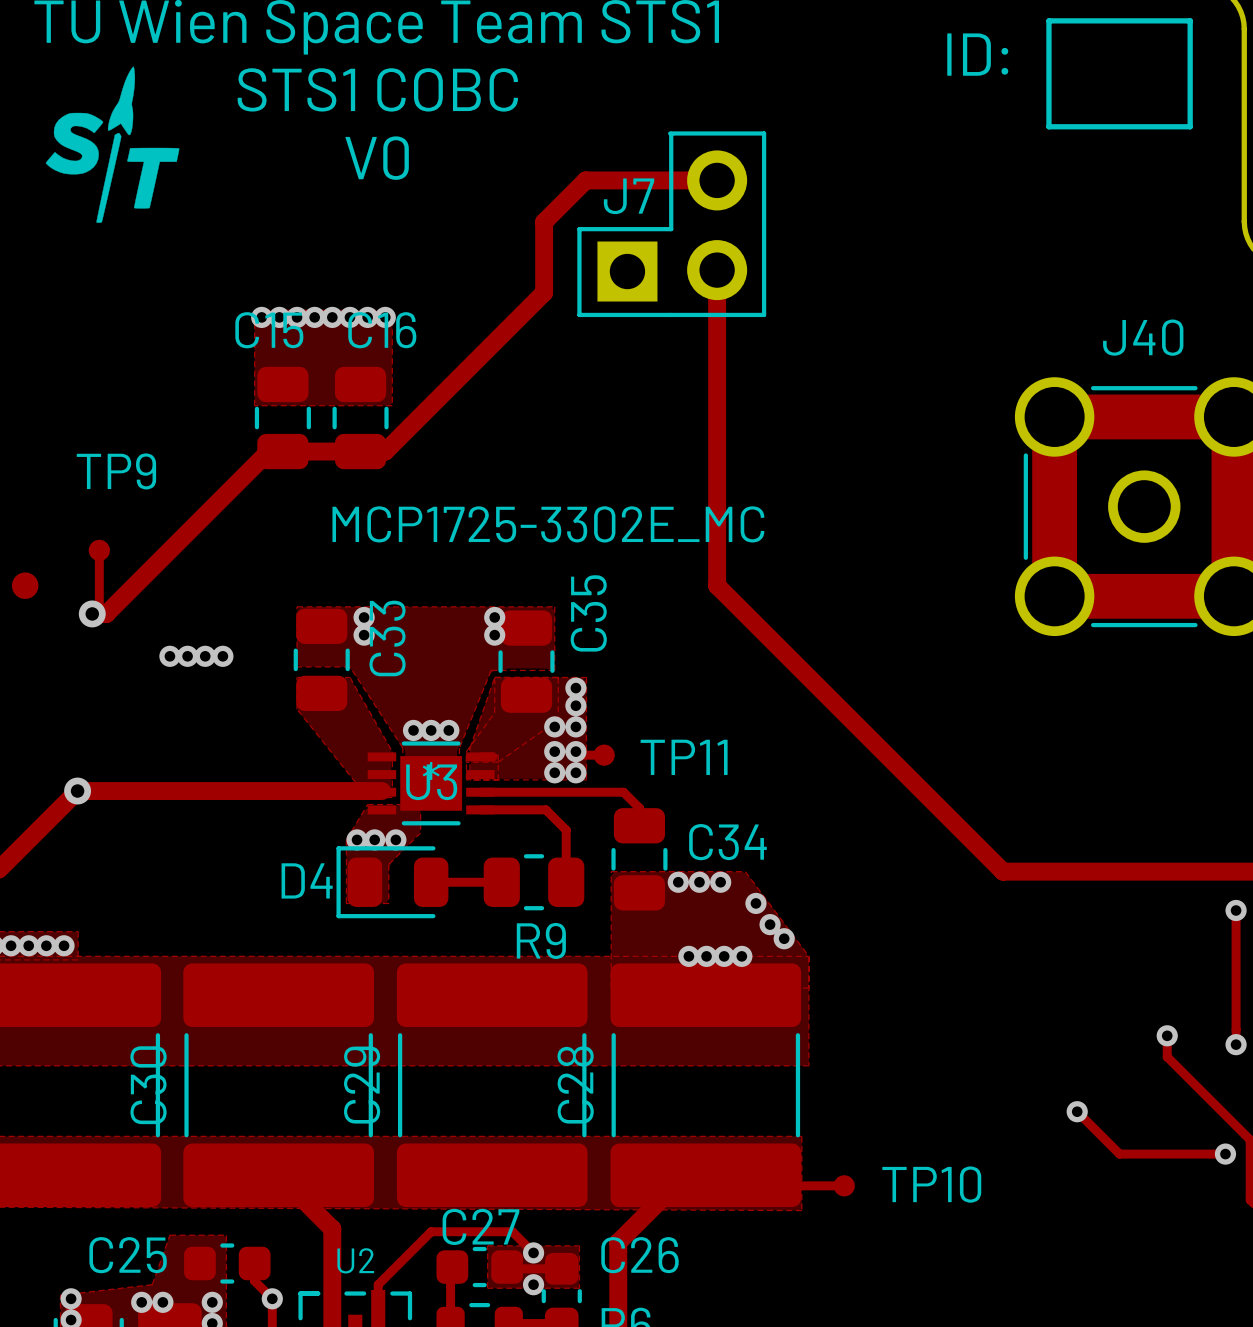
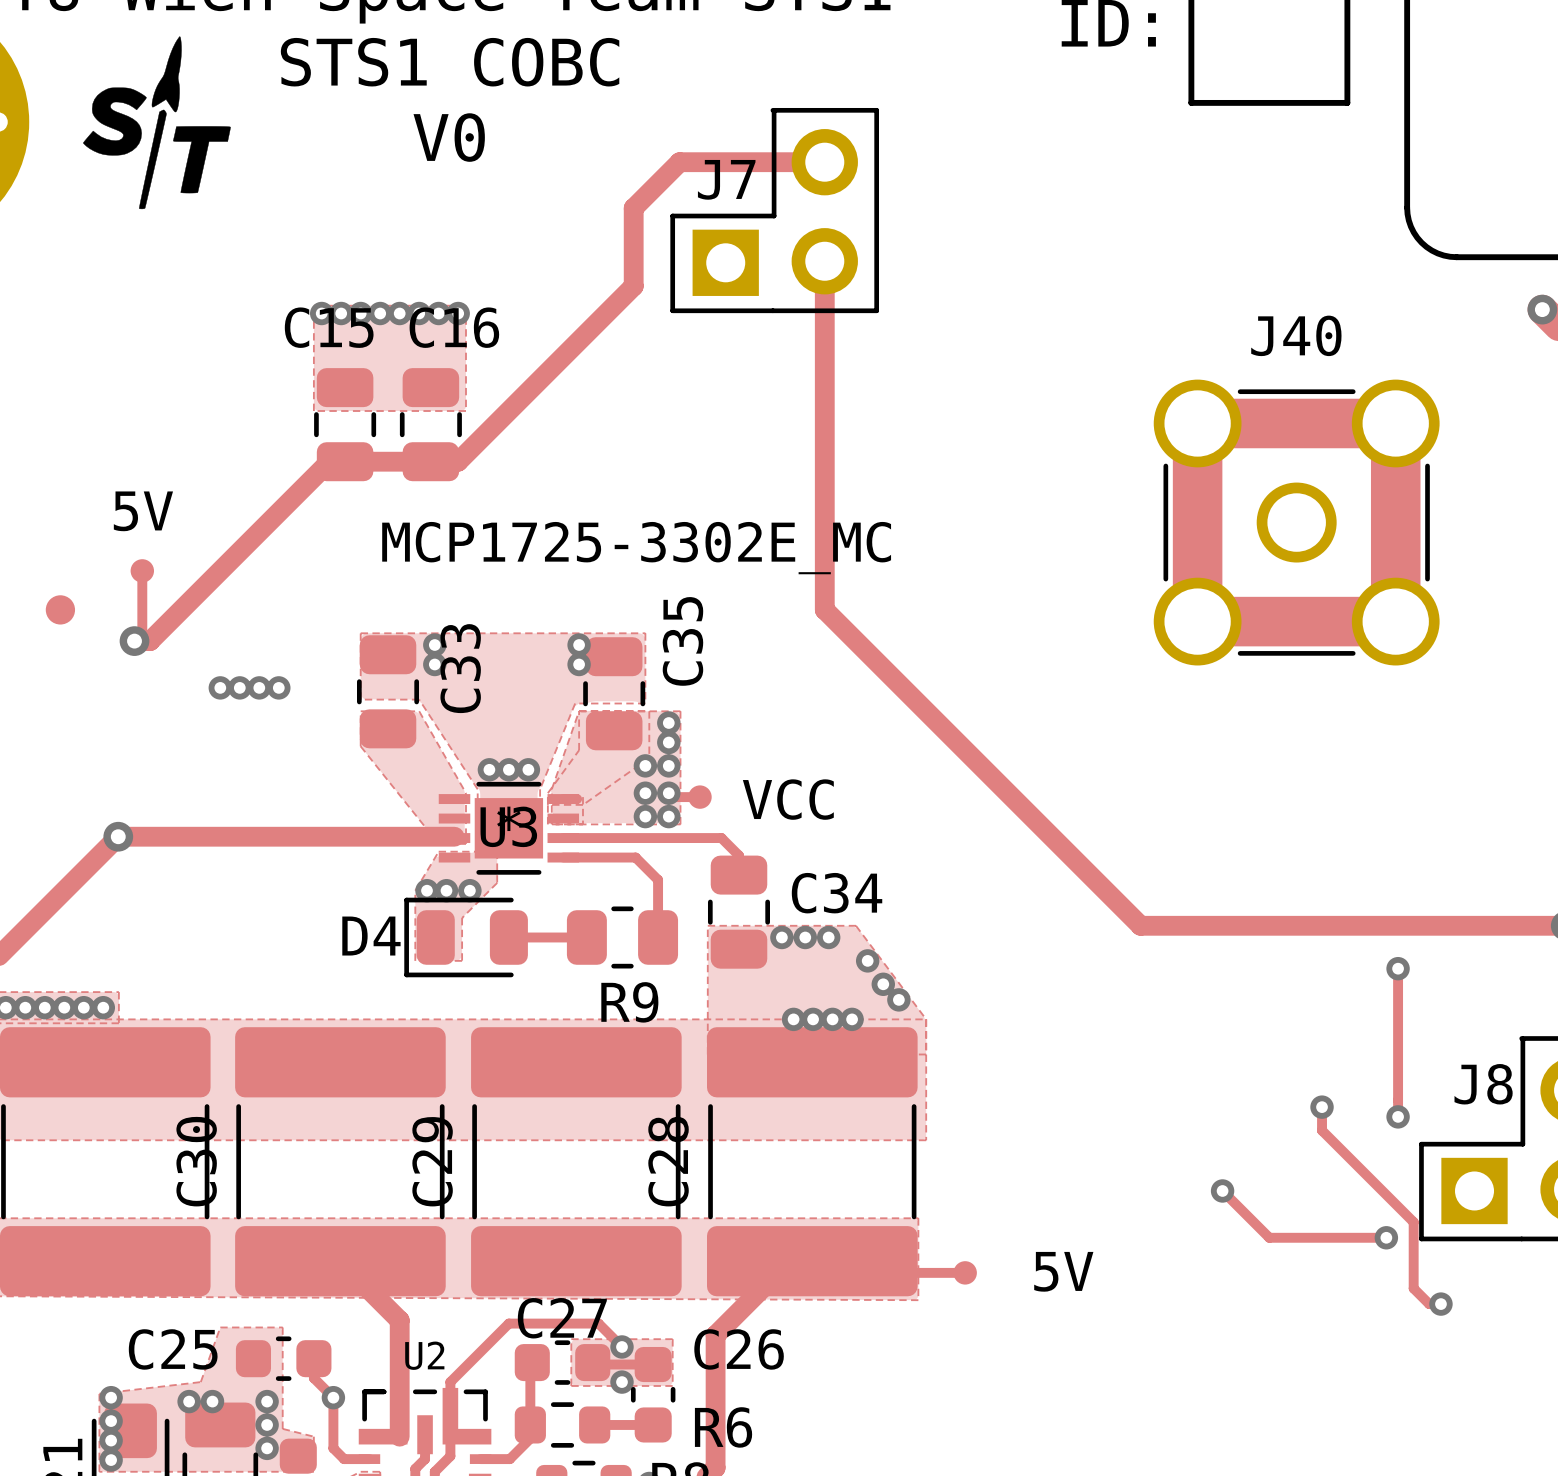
TP9 name: TP9 (116, 471) -> 5V (143, 511)
TP11 name: TP11 (684, 757) -> VCC (788, 799)
TP10 name: TP10 (931, 1184) -> 5V (1063, 1271)

